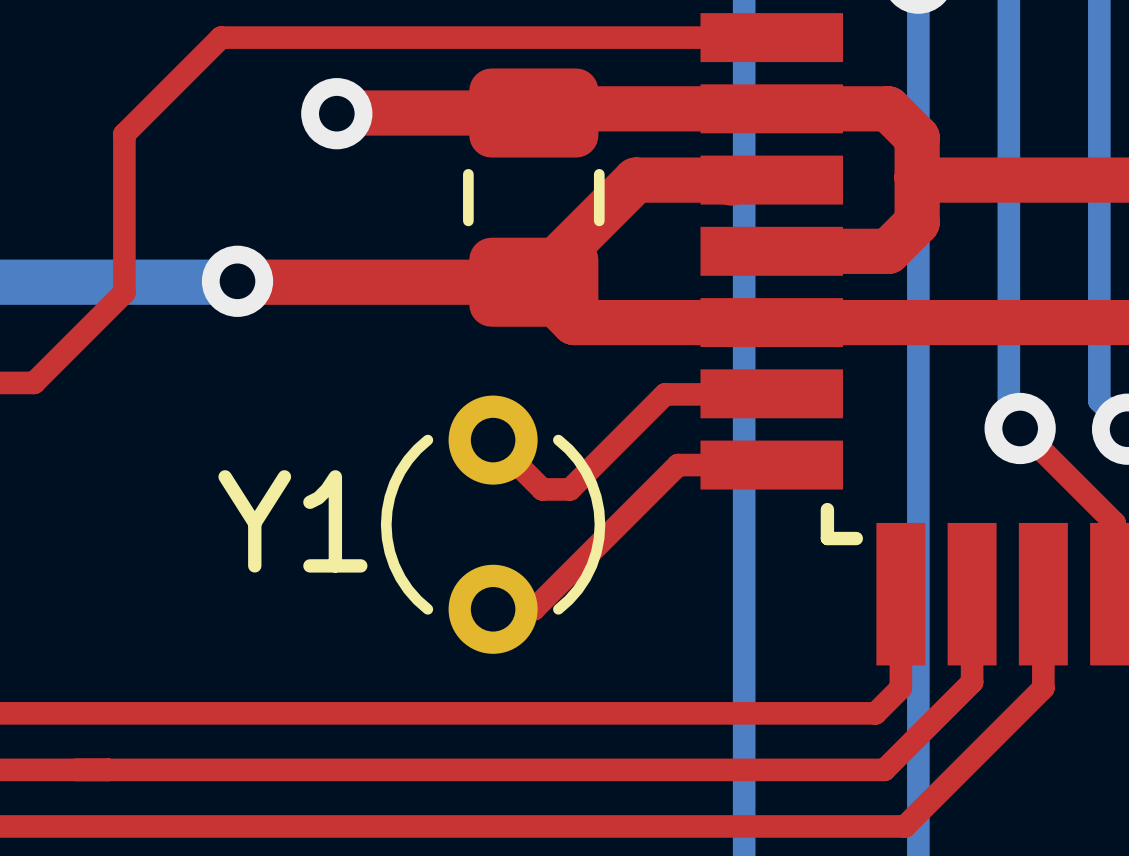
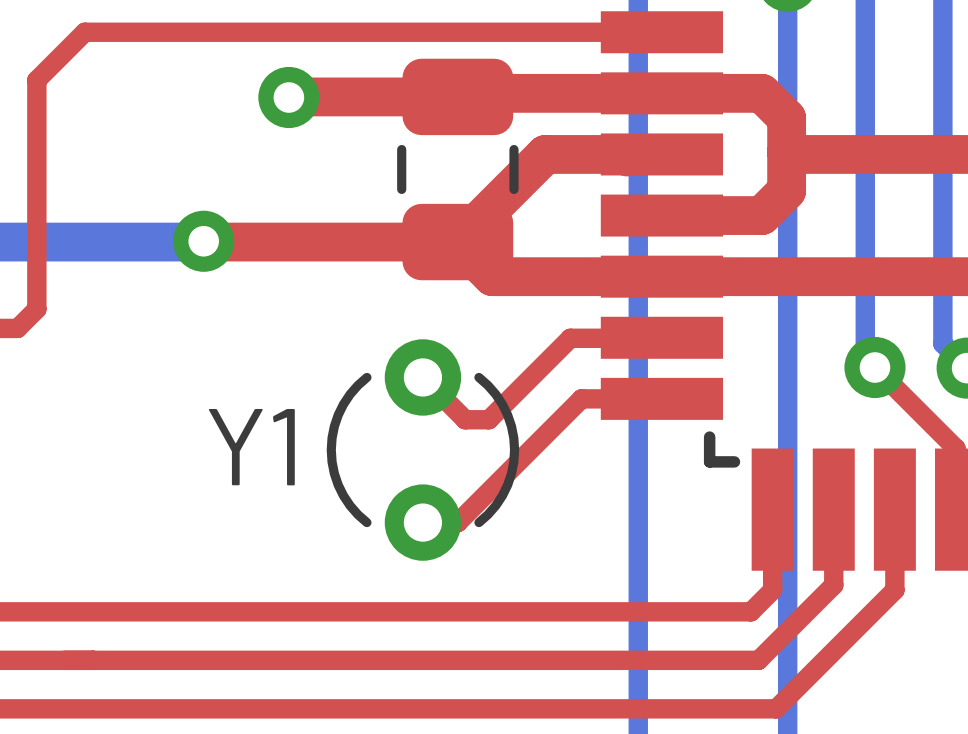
top track: (221, 37) (124, 134) (124, 292) (34, 382) (20, 382) -> (189, 32) (84, 32) (36, 80) (36, 309) (17, 328)

